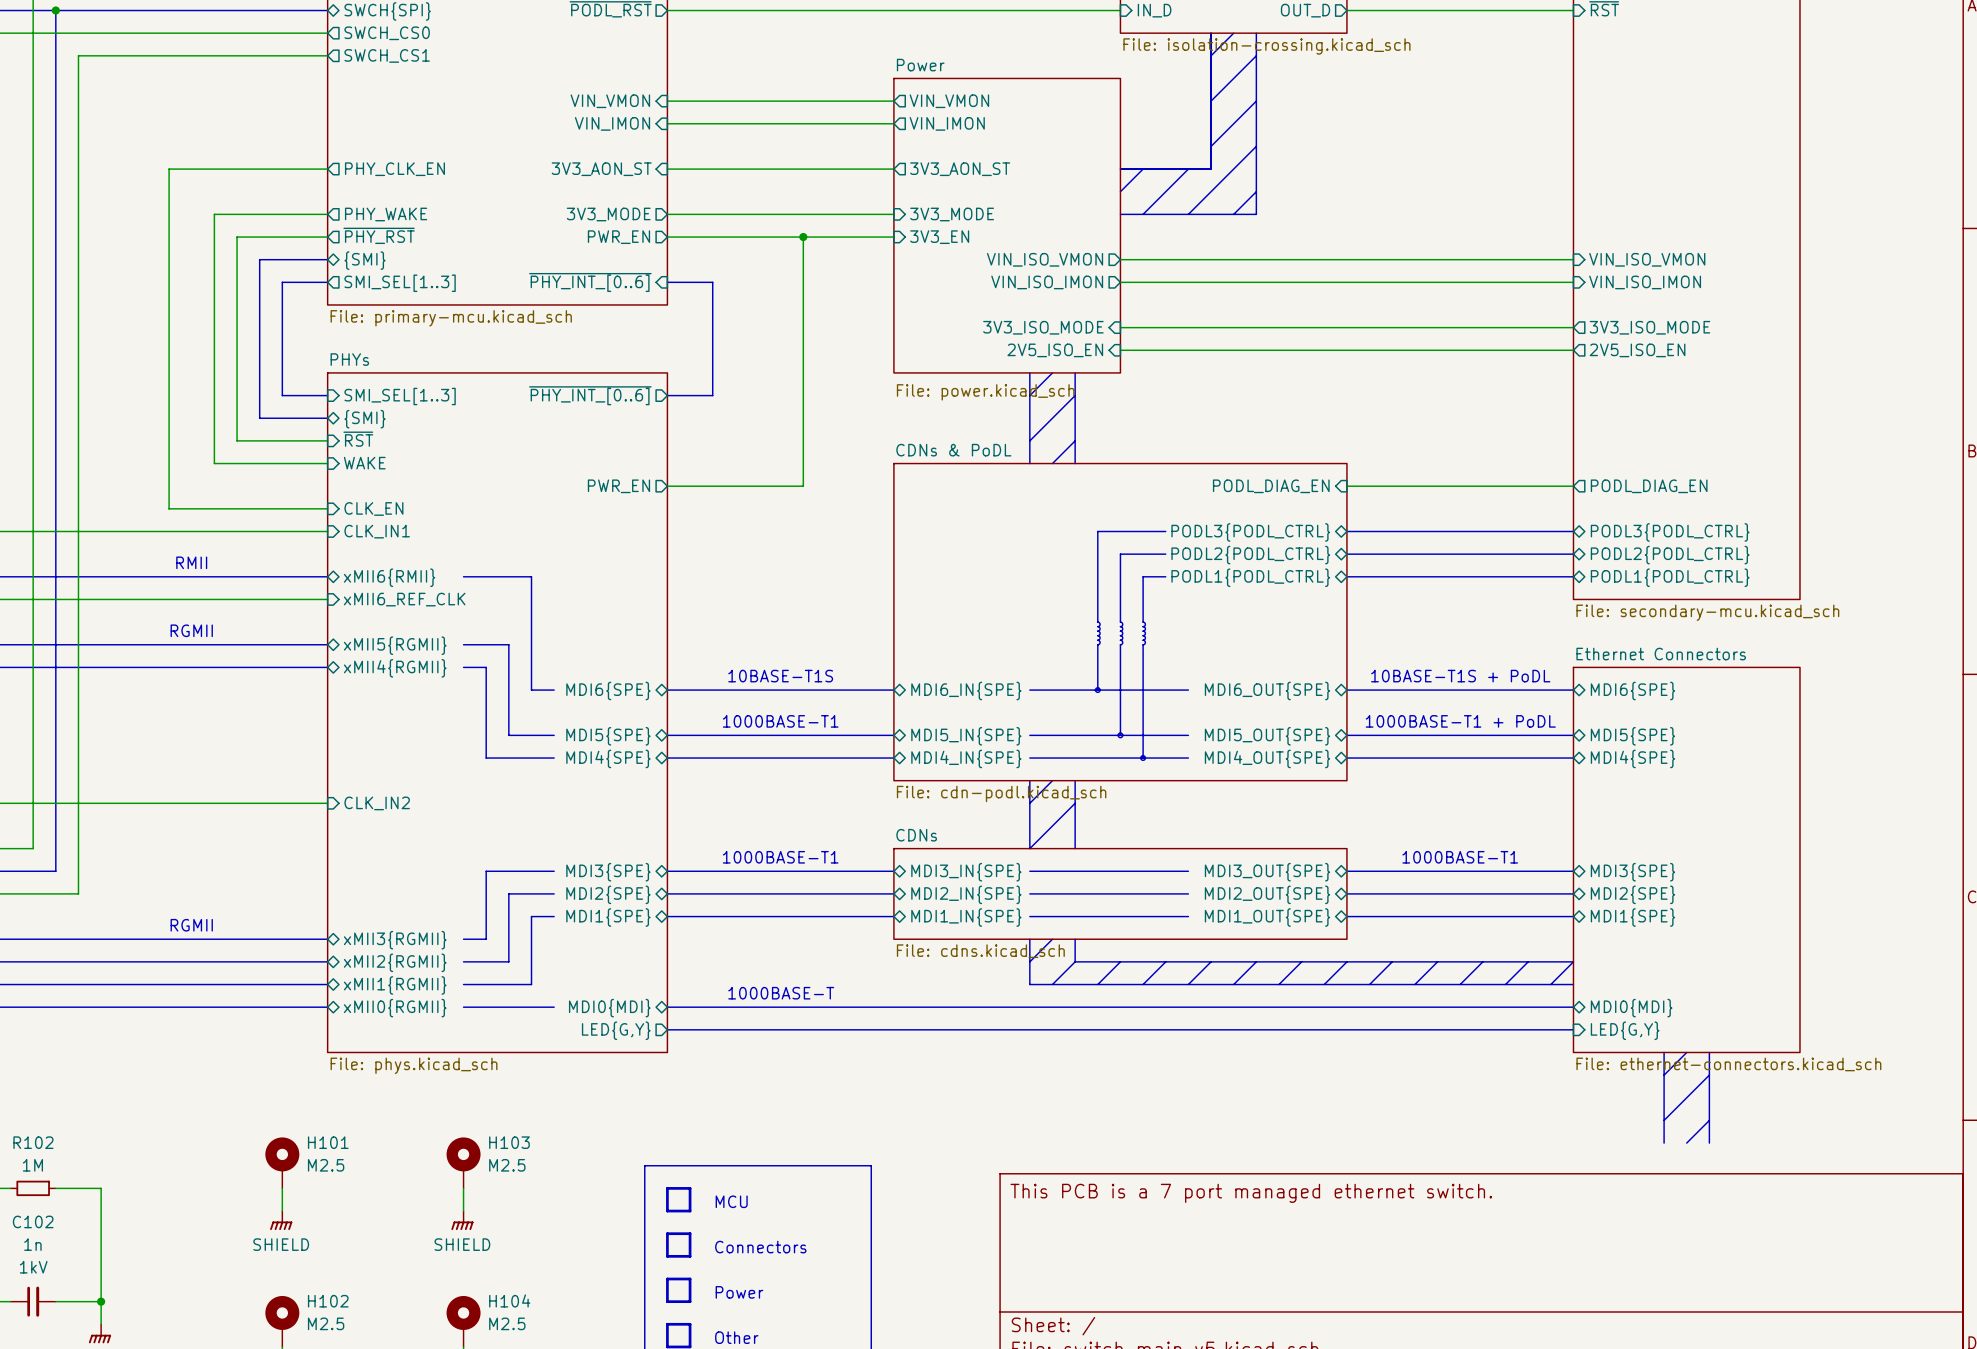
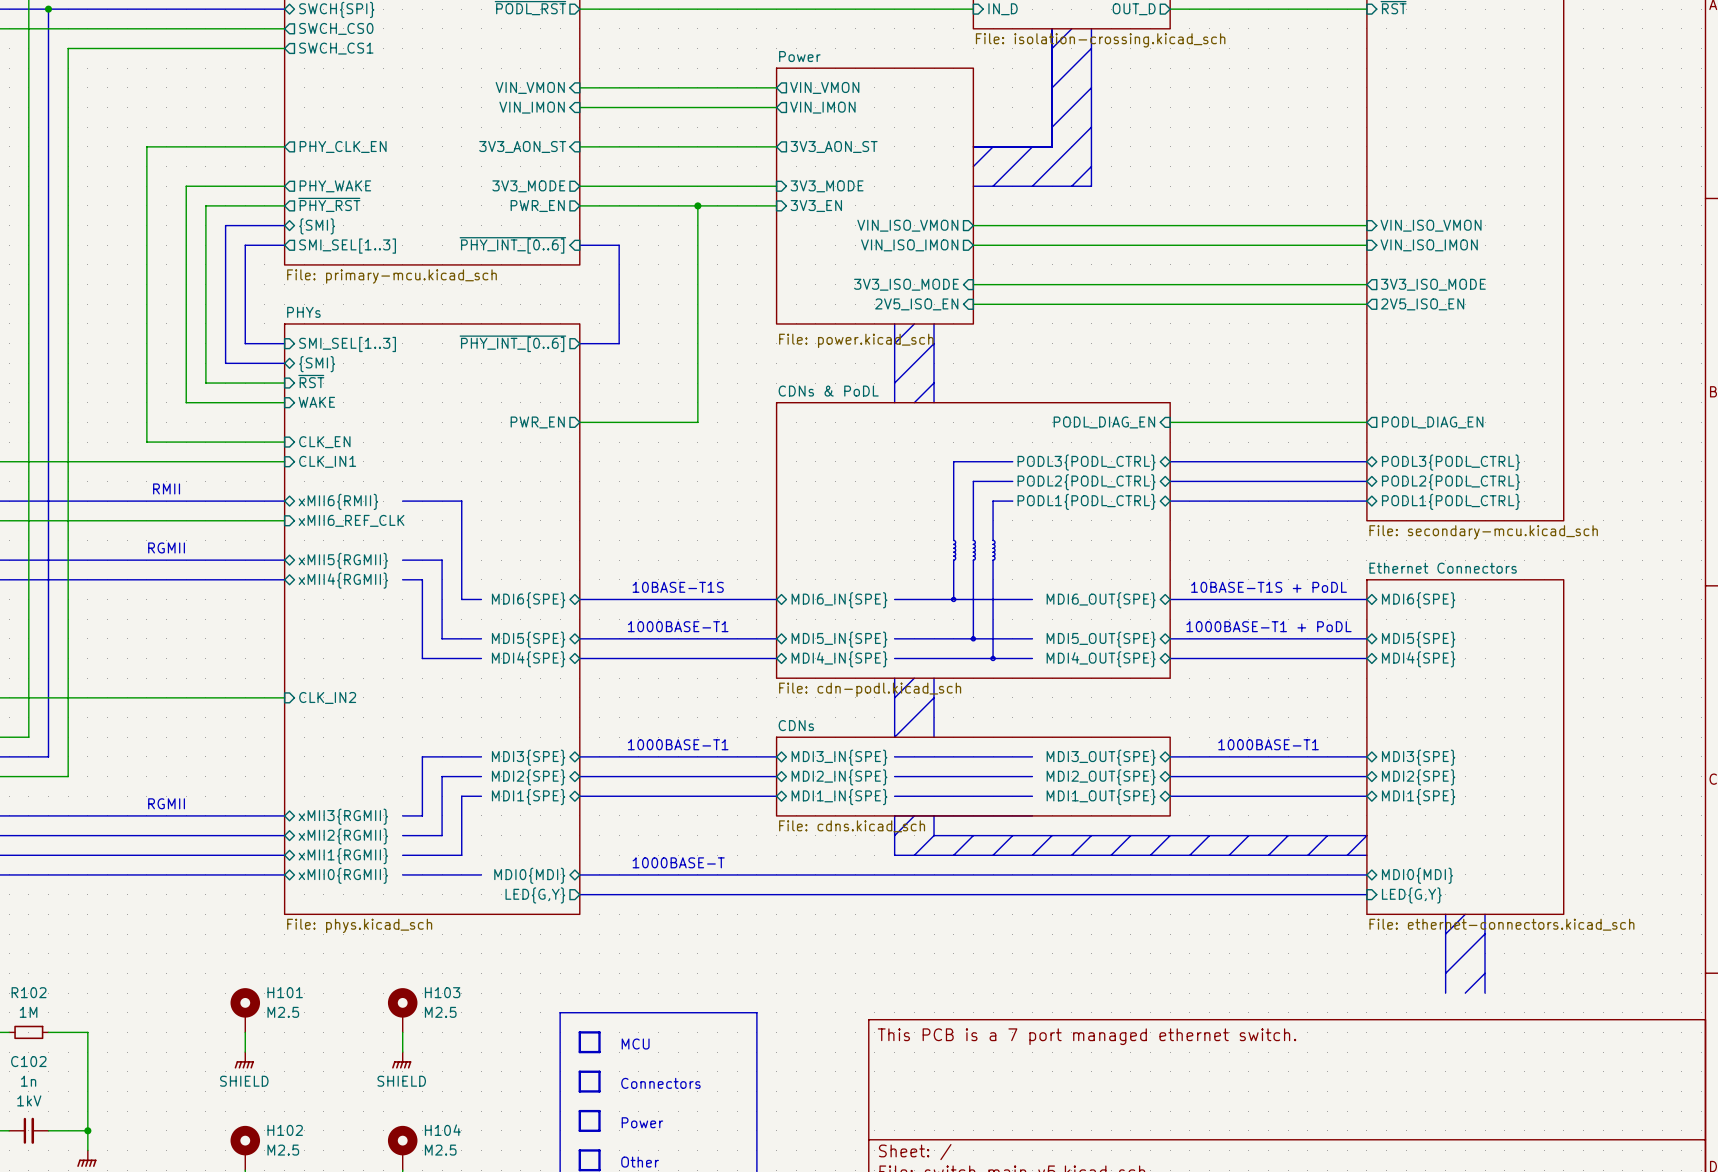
line: none -> (894, 815) (1032, 815)

